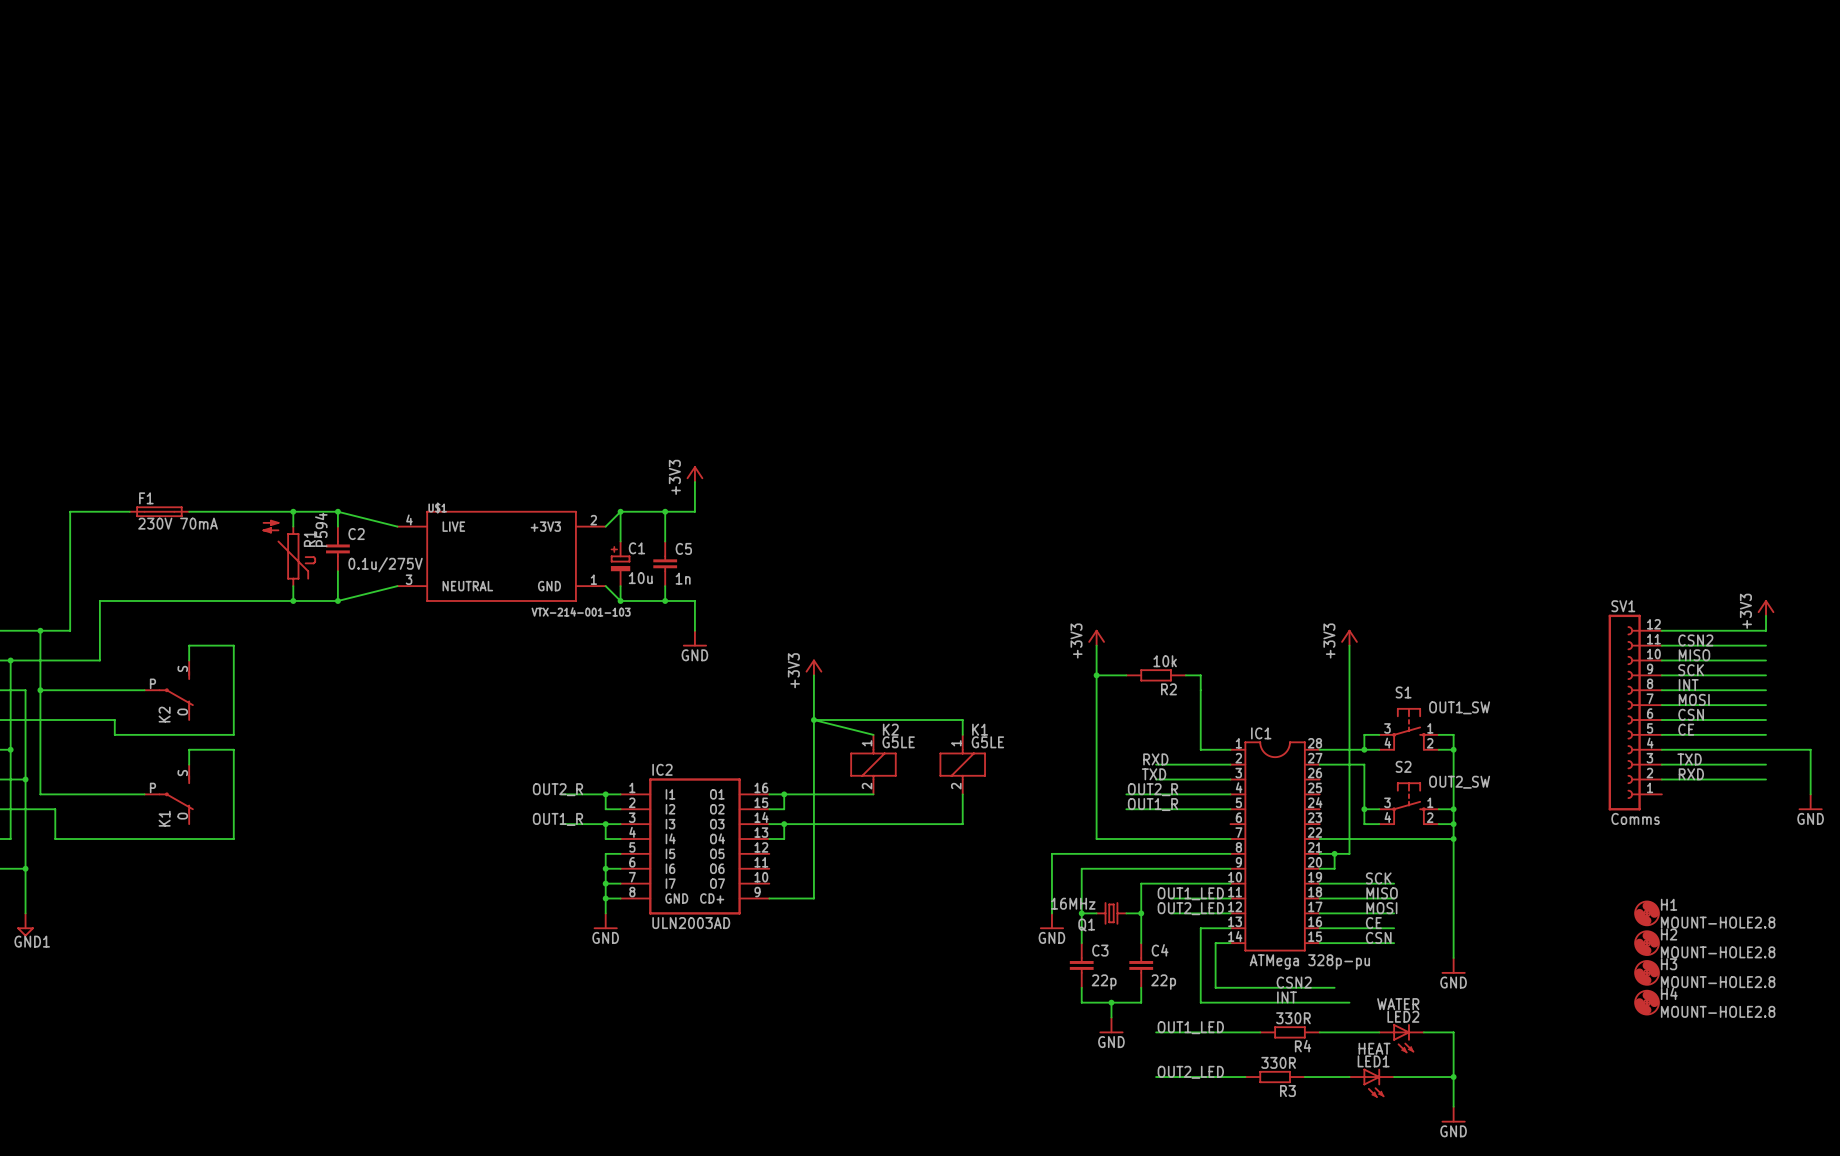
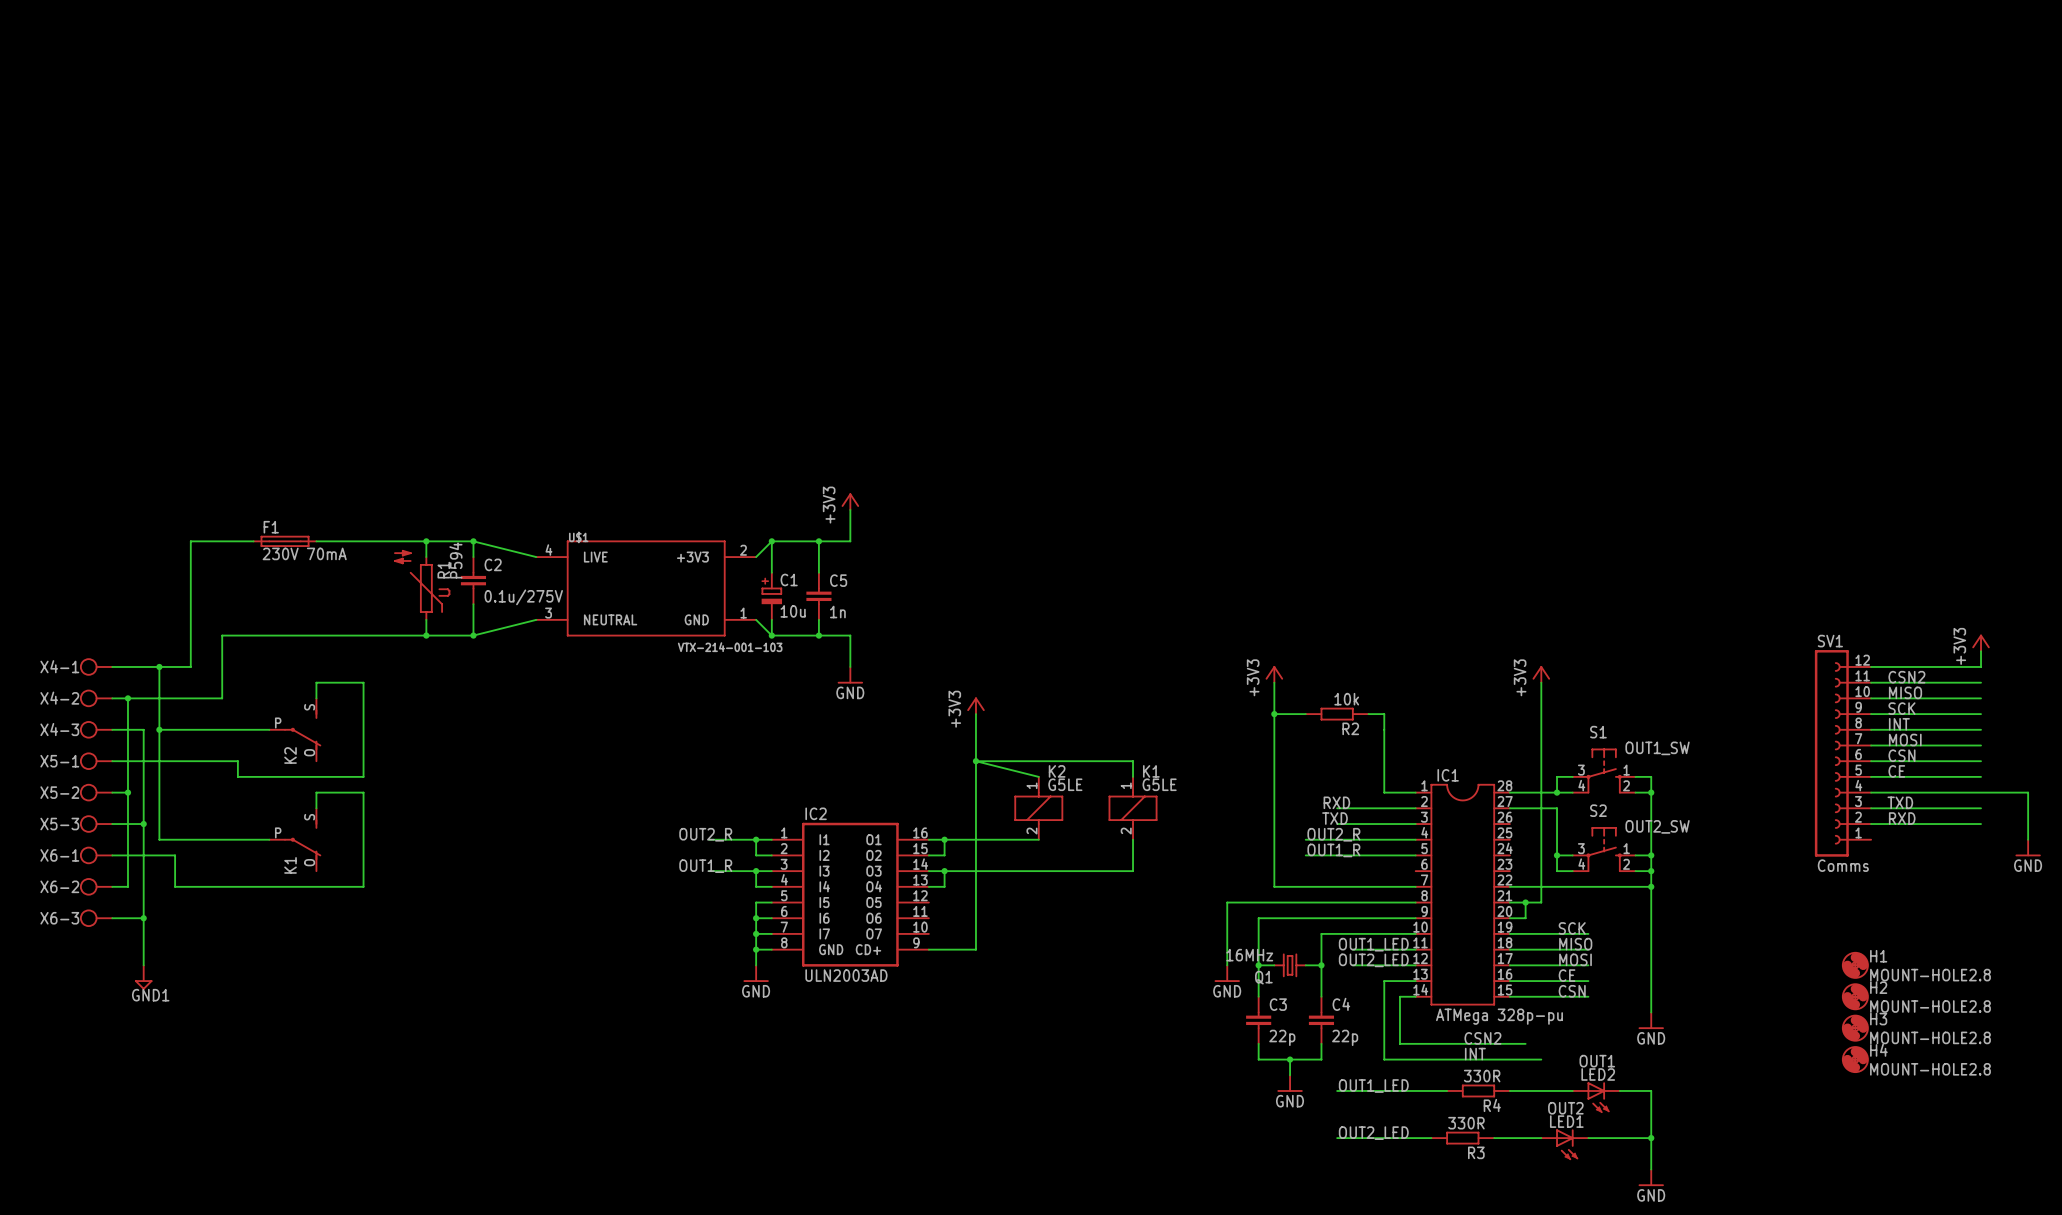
LED2 value: WATER (1398, 1004) -> OUT1 (1597, 1061)
LED1 value: HEAT (1374, 1048) -> OUT2 (1565, 1108)

